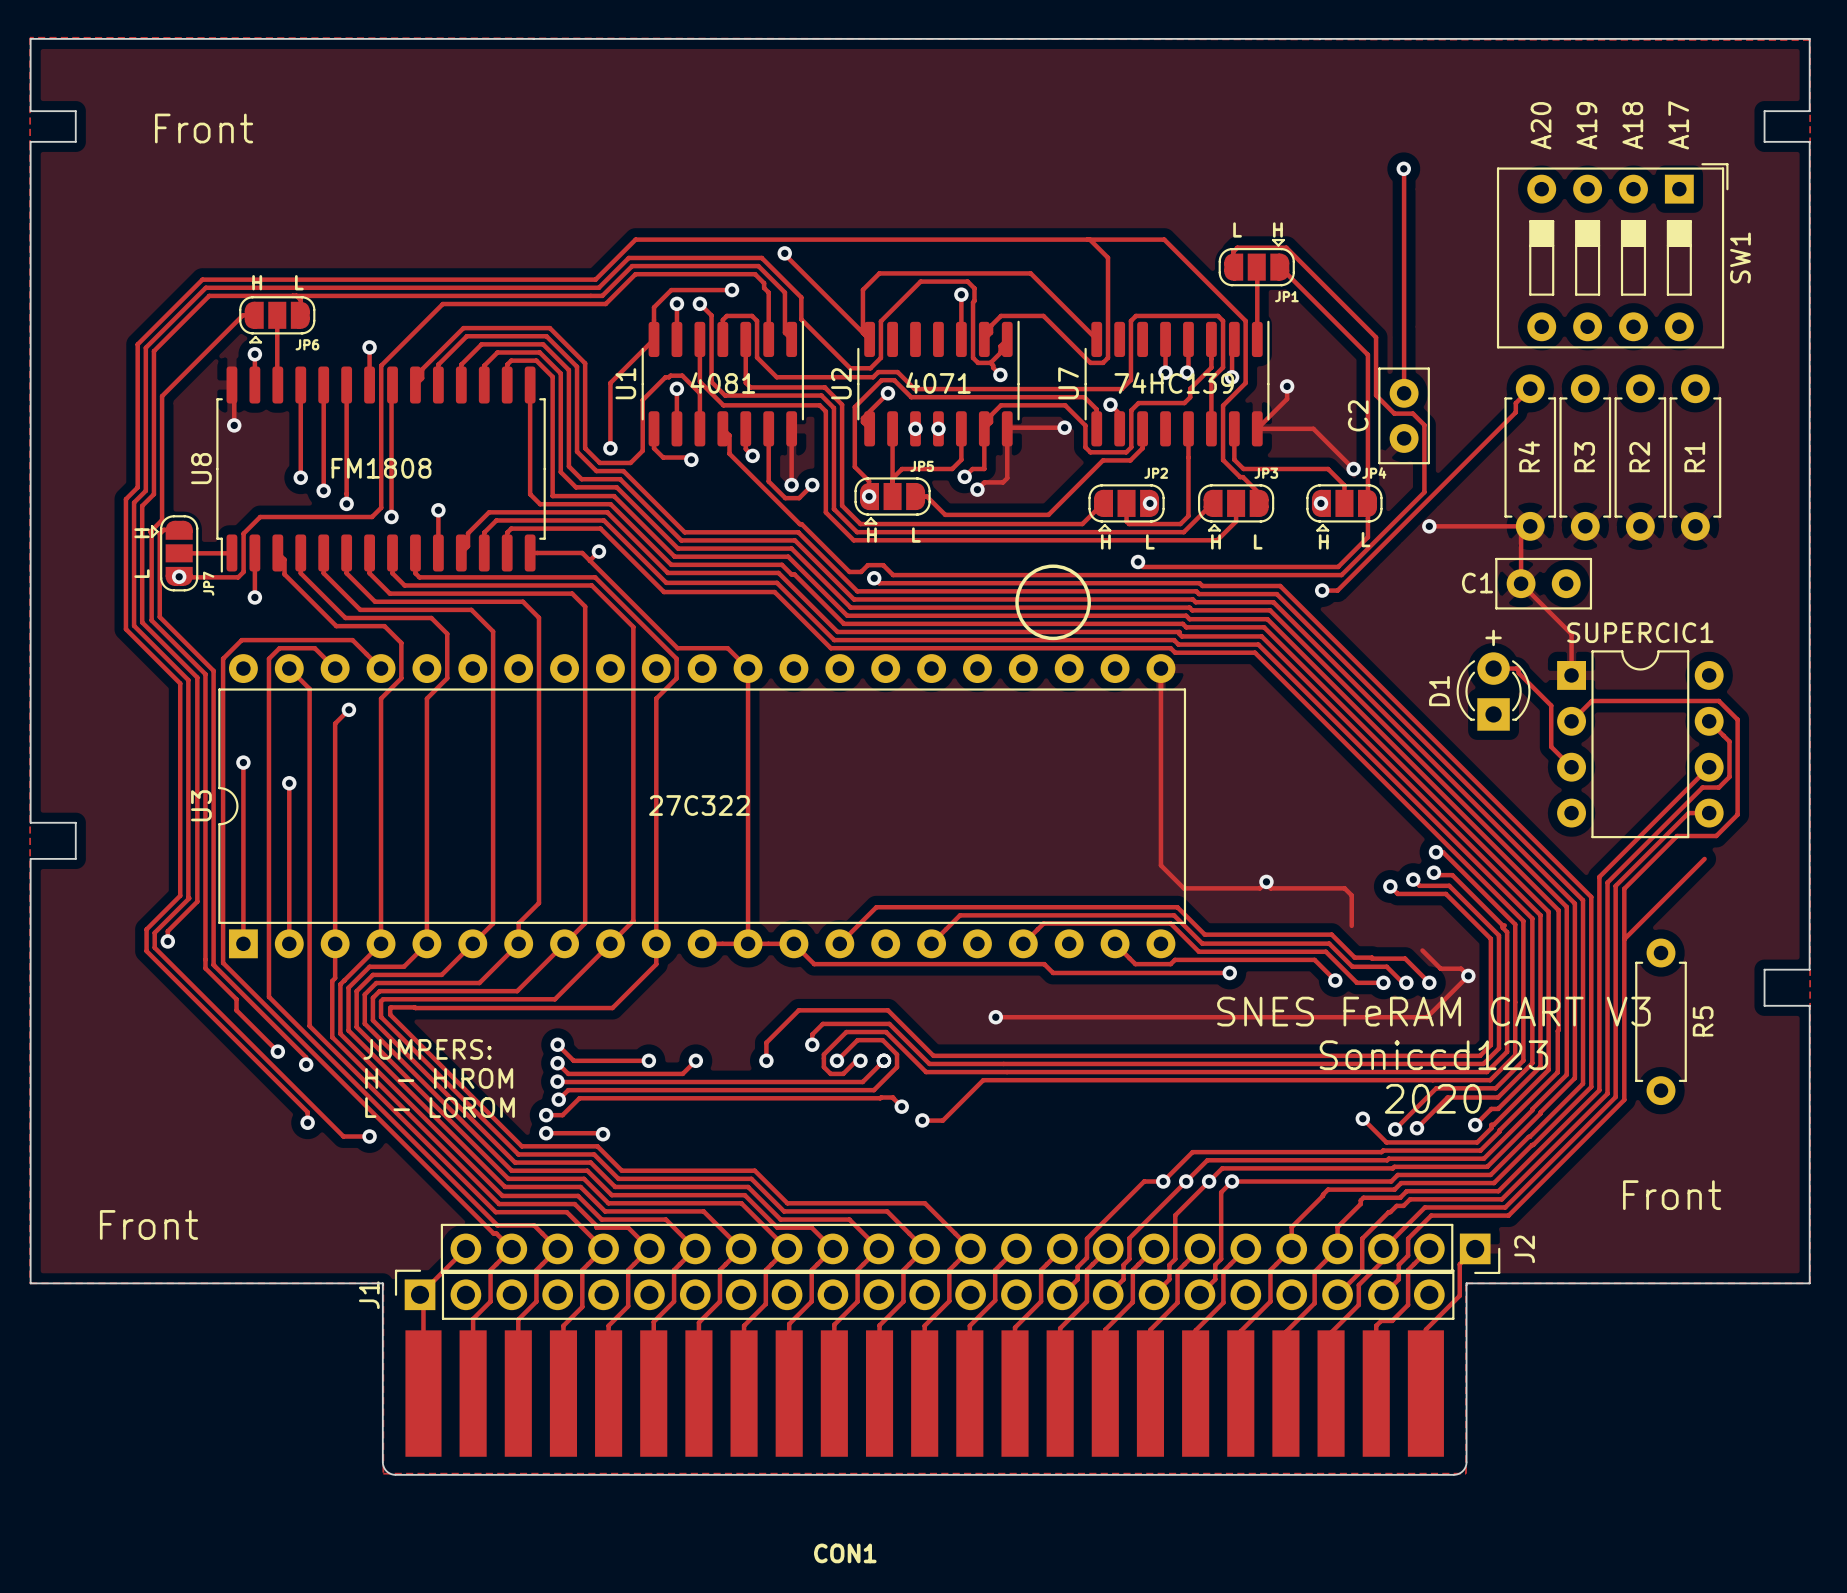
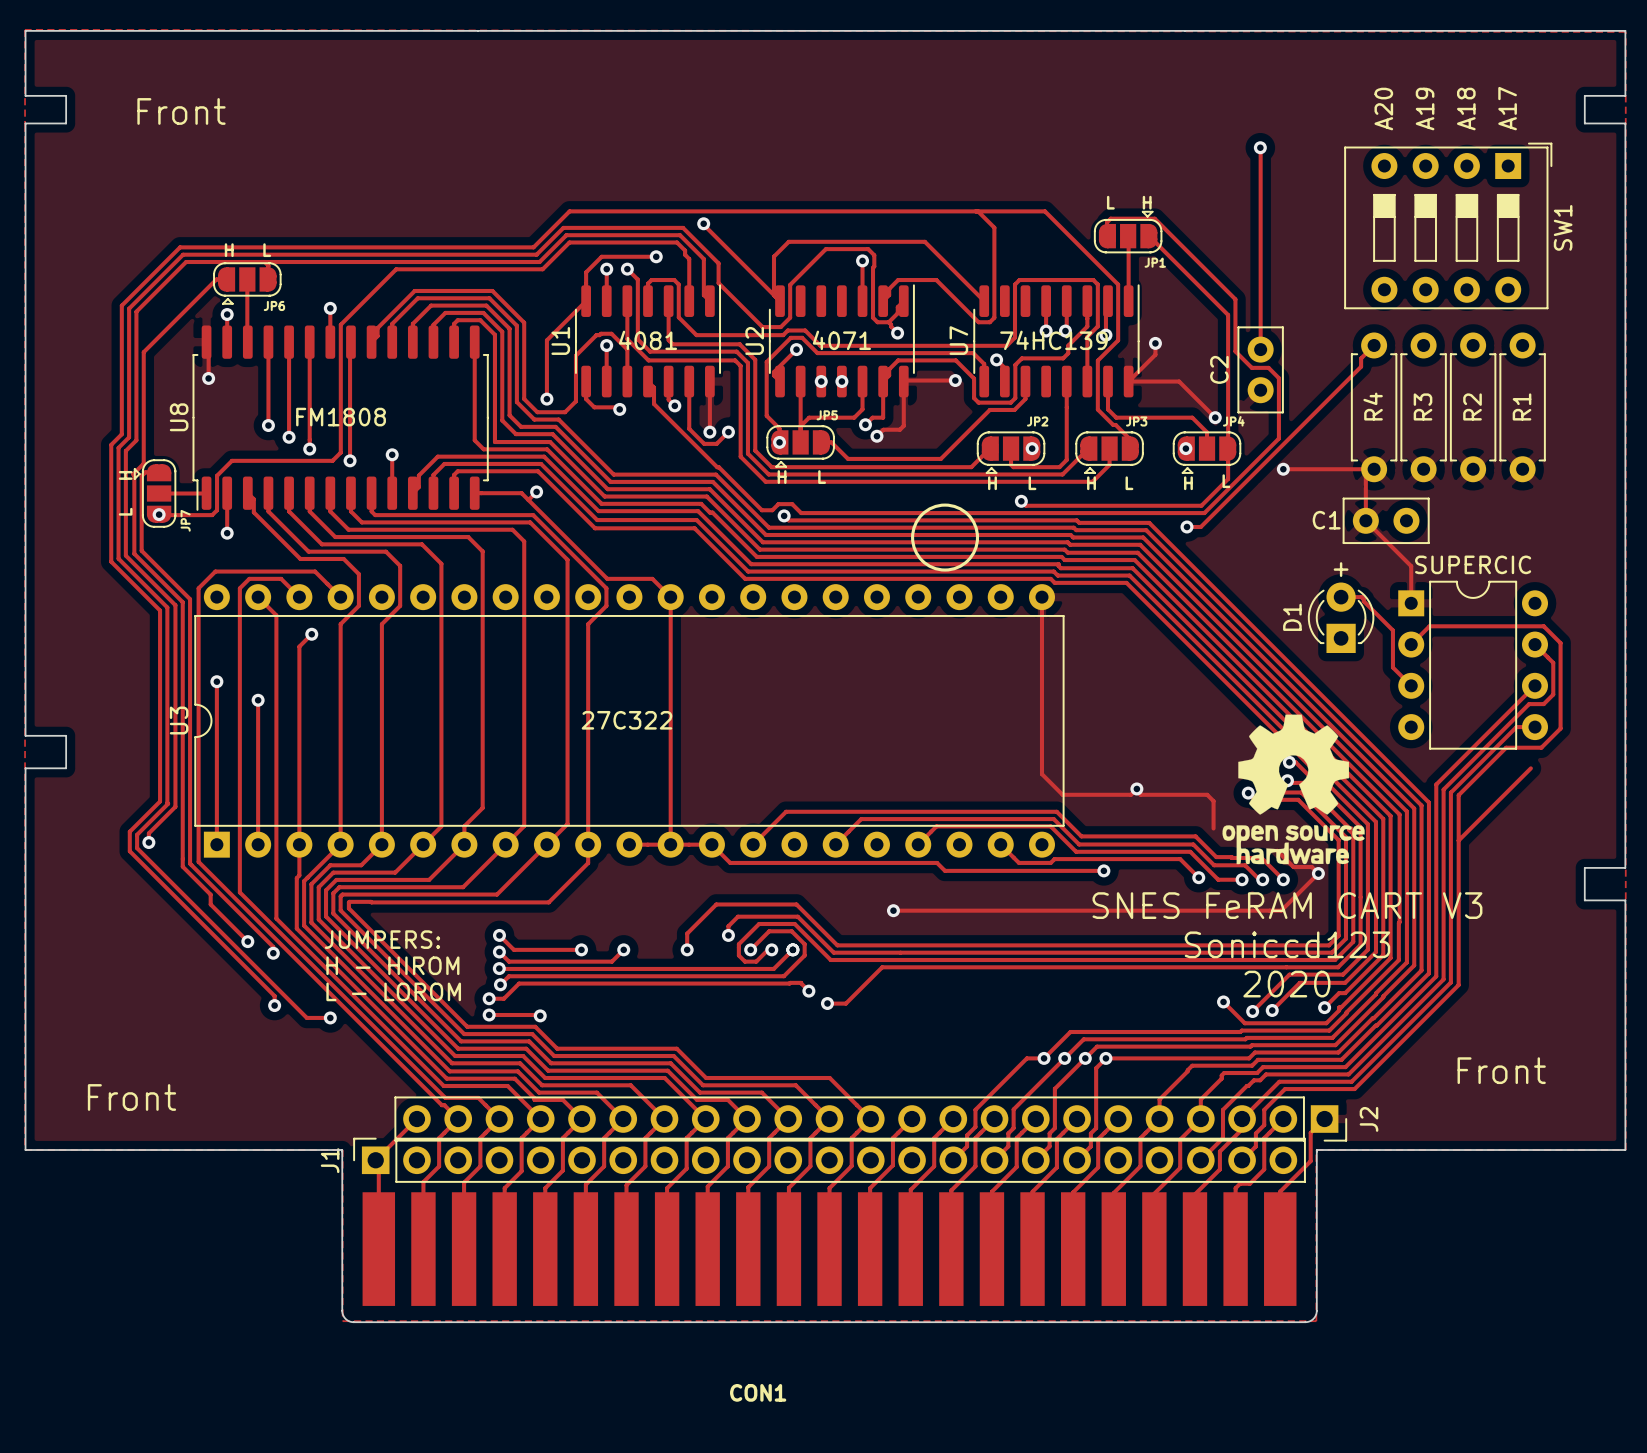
SUPERCIC1 name: SUPERCIC1 (1640, 632) -> SUPERCIC (1473, 564)
drawing: none -> [1222, 714, 1365, 865]
R5: (1661, 1021) -> none

